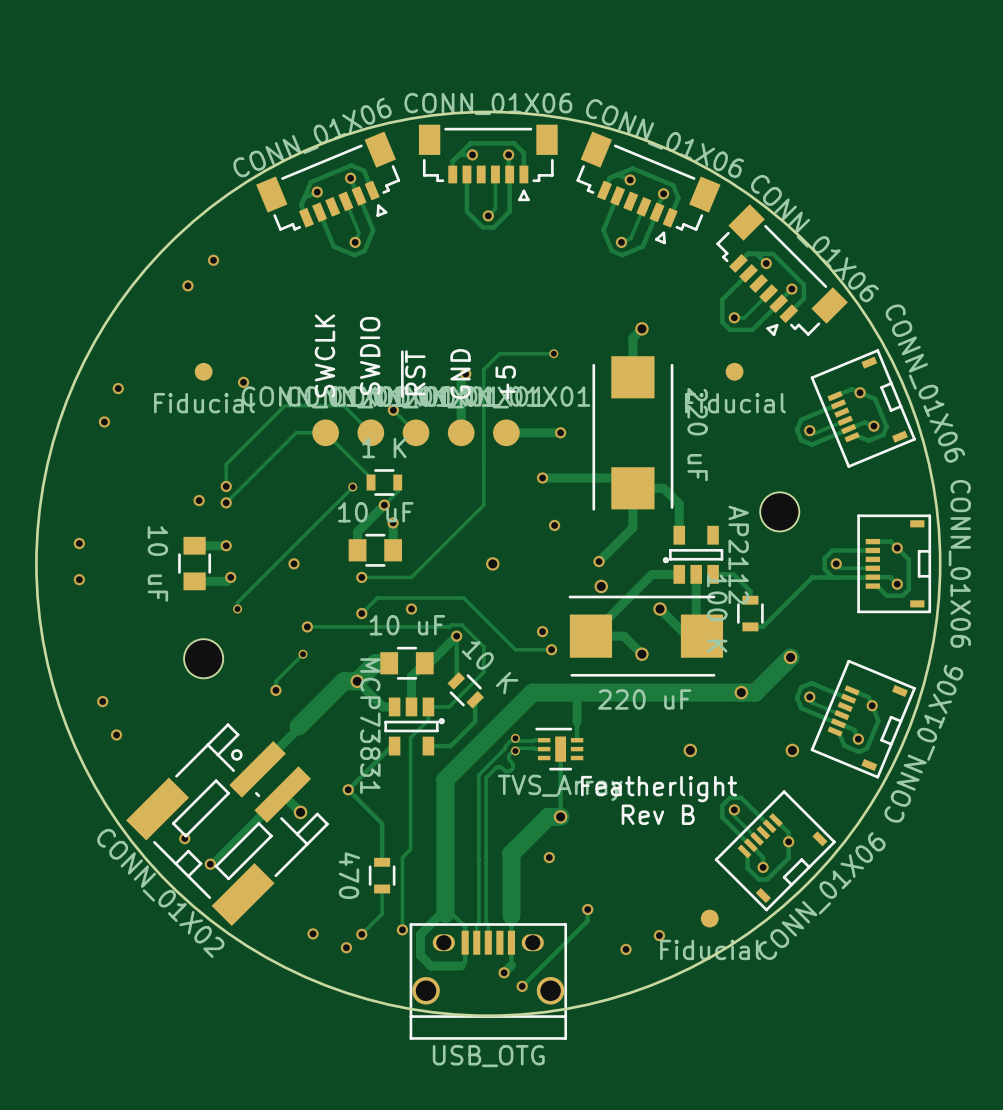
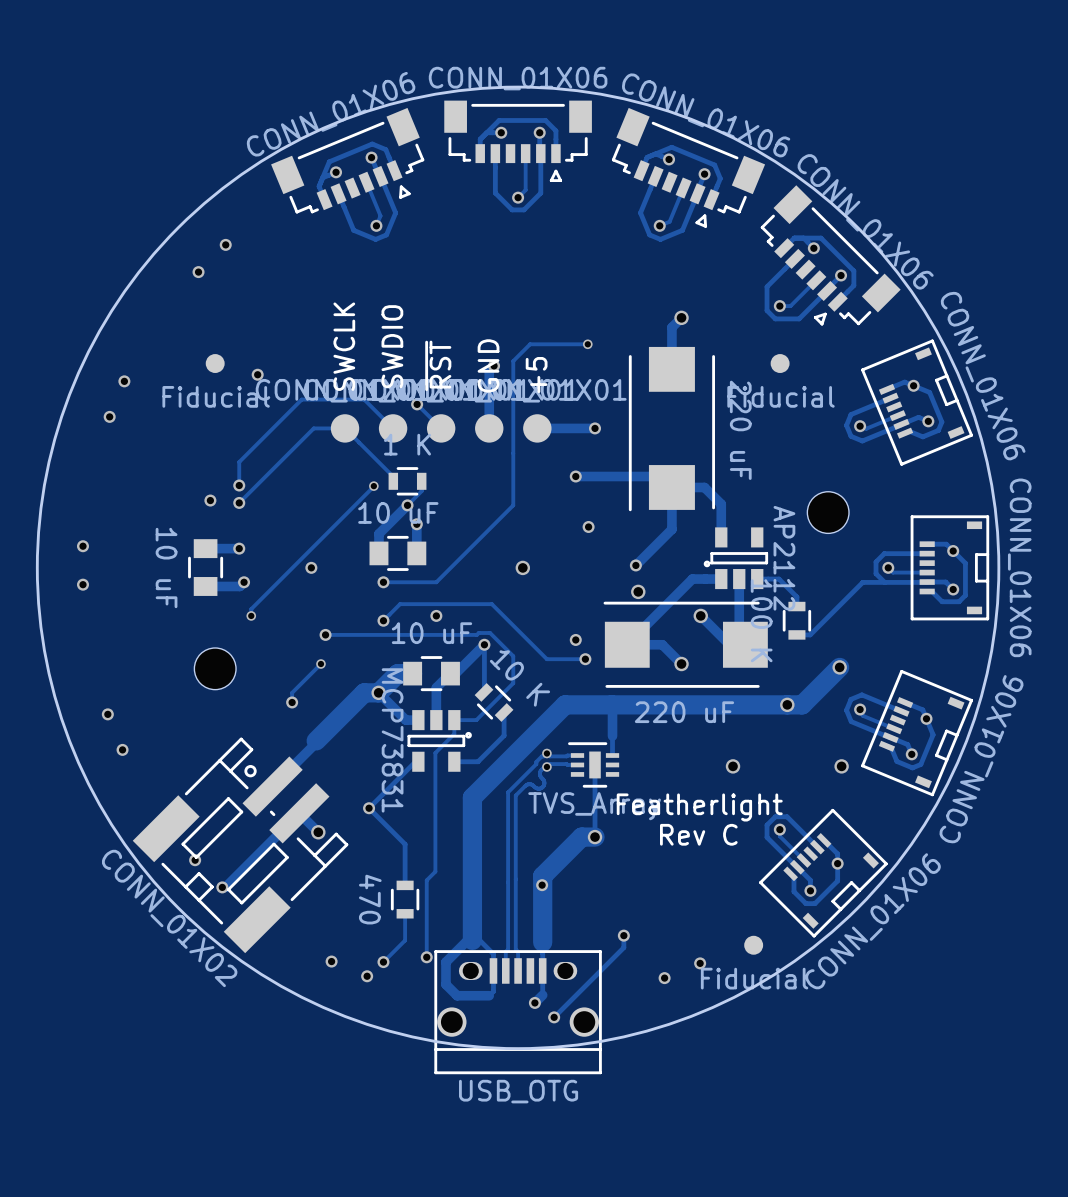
text: Rev B (658, 814) -> Rev C (698, 834)
via position: (549, 857) -> (542, 885)

